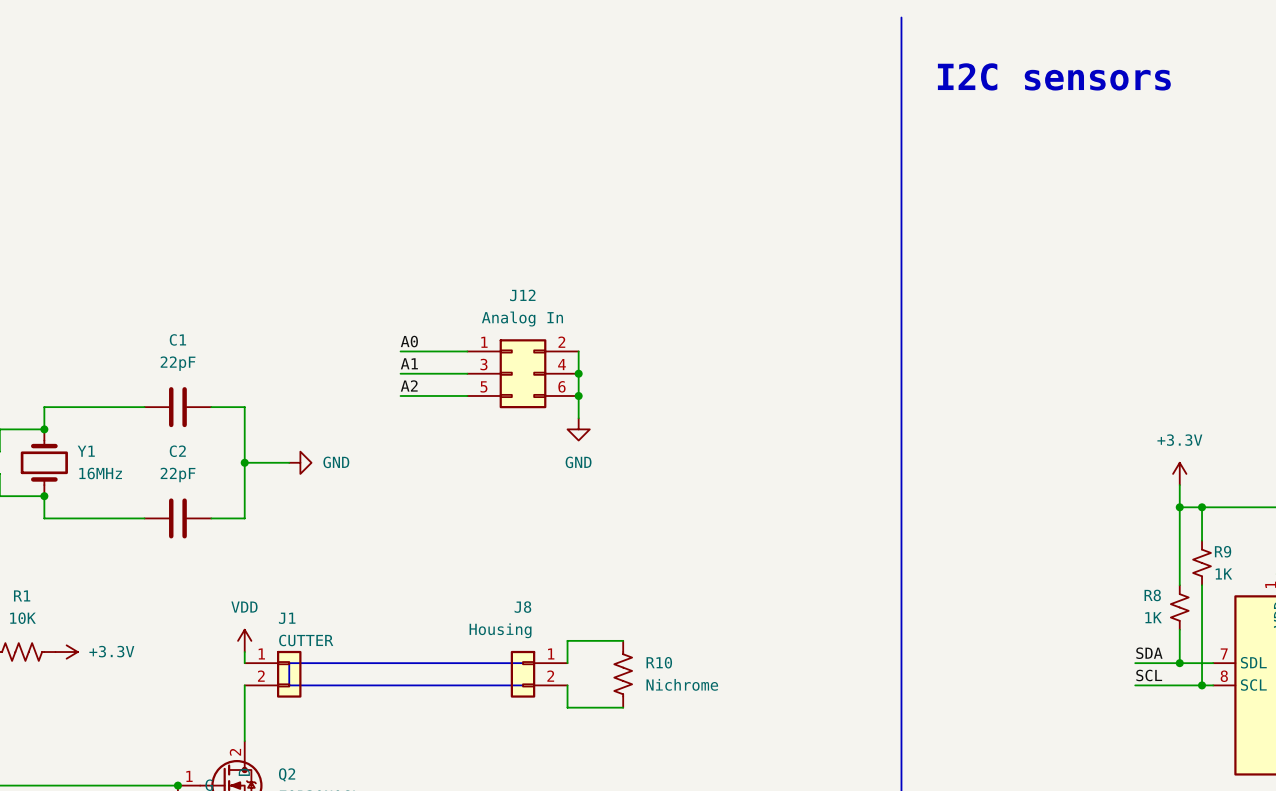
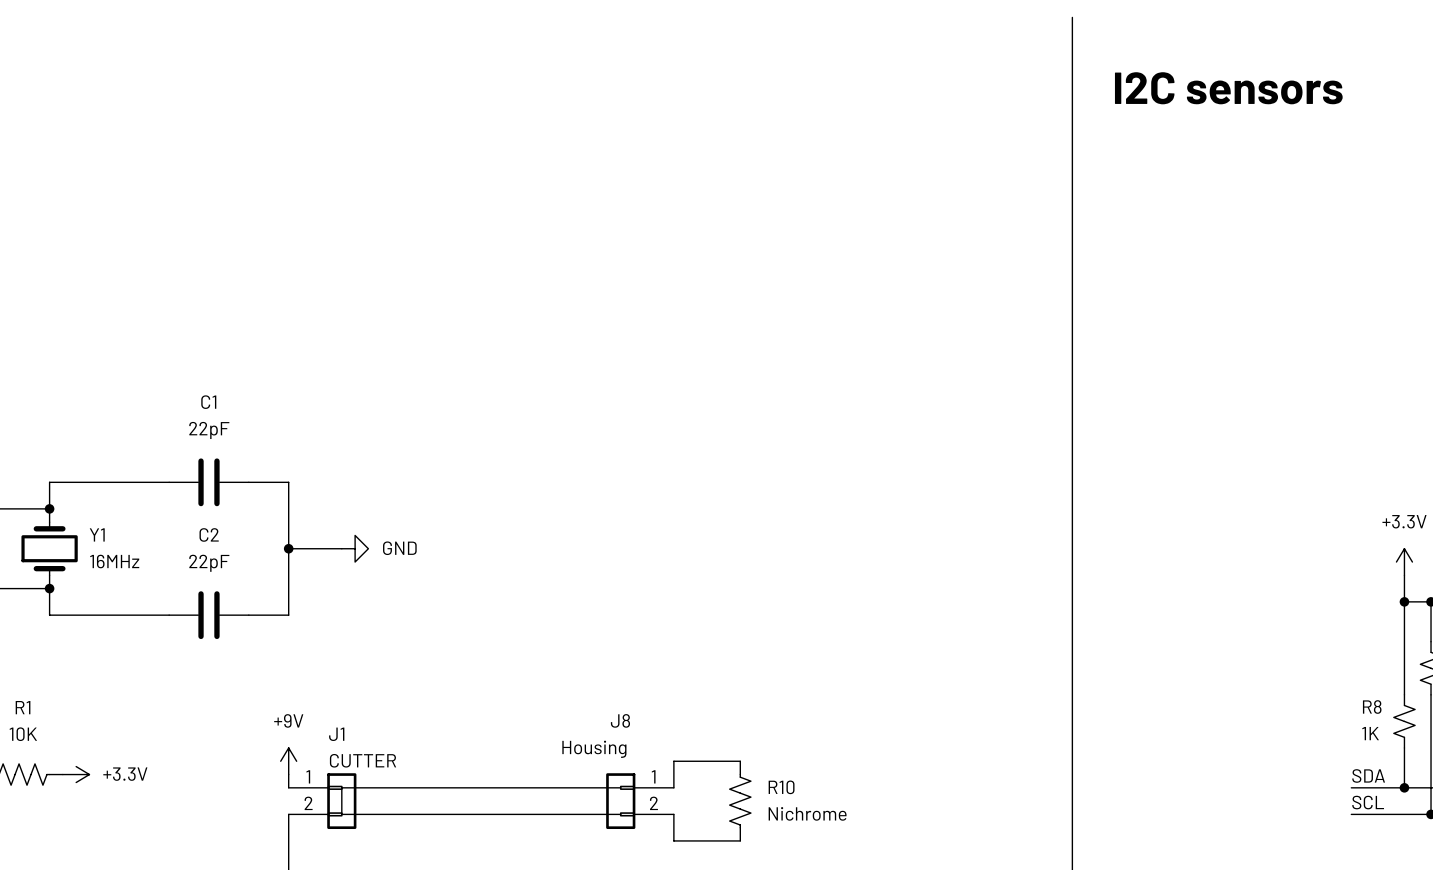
label: A0 (409, 341) -> none
wire: (400, 351) (467, 351) -> none
wire: (578, 351) (578, 418) -> none
label: A1 (409, 363) -> none
wire: (400, 373) (467, 373) -> none
J12: Analog In (523, 373) -> none
junction: (578, 373) -> none
label: A2 (409, 385) -> none
wire: (400, 395) (467, 395) -> none
junction: (578, 395) -> none
power symbol: GND (578, 429) -> none
power symbol: VDD (244, 640) -> +9V (288, 761)

